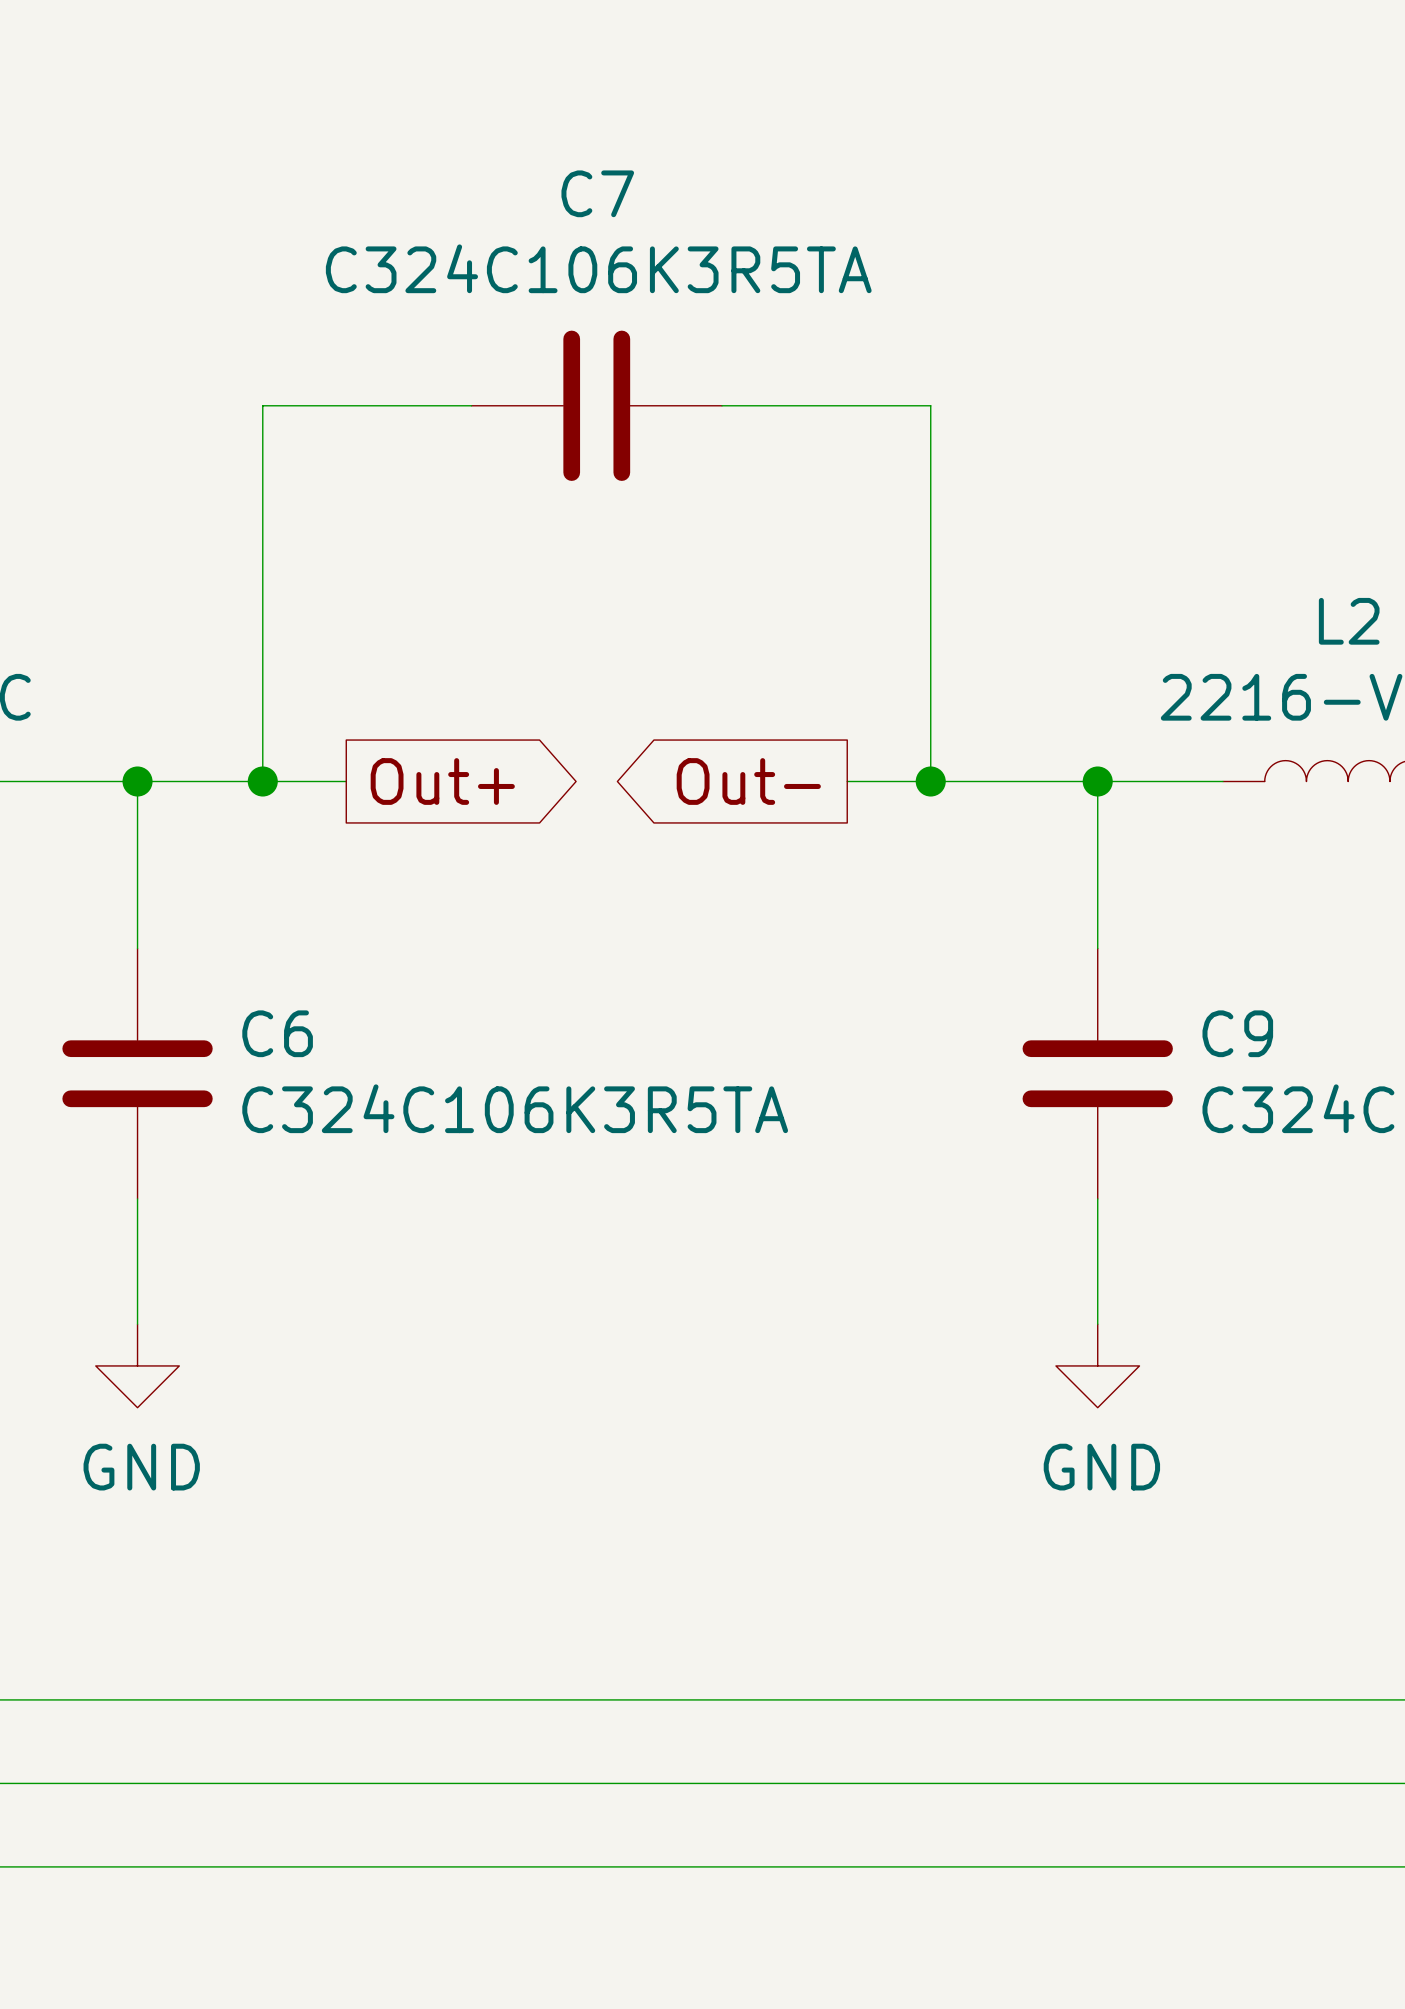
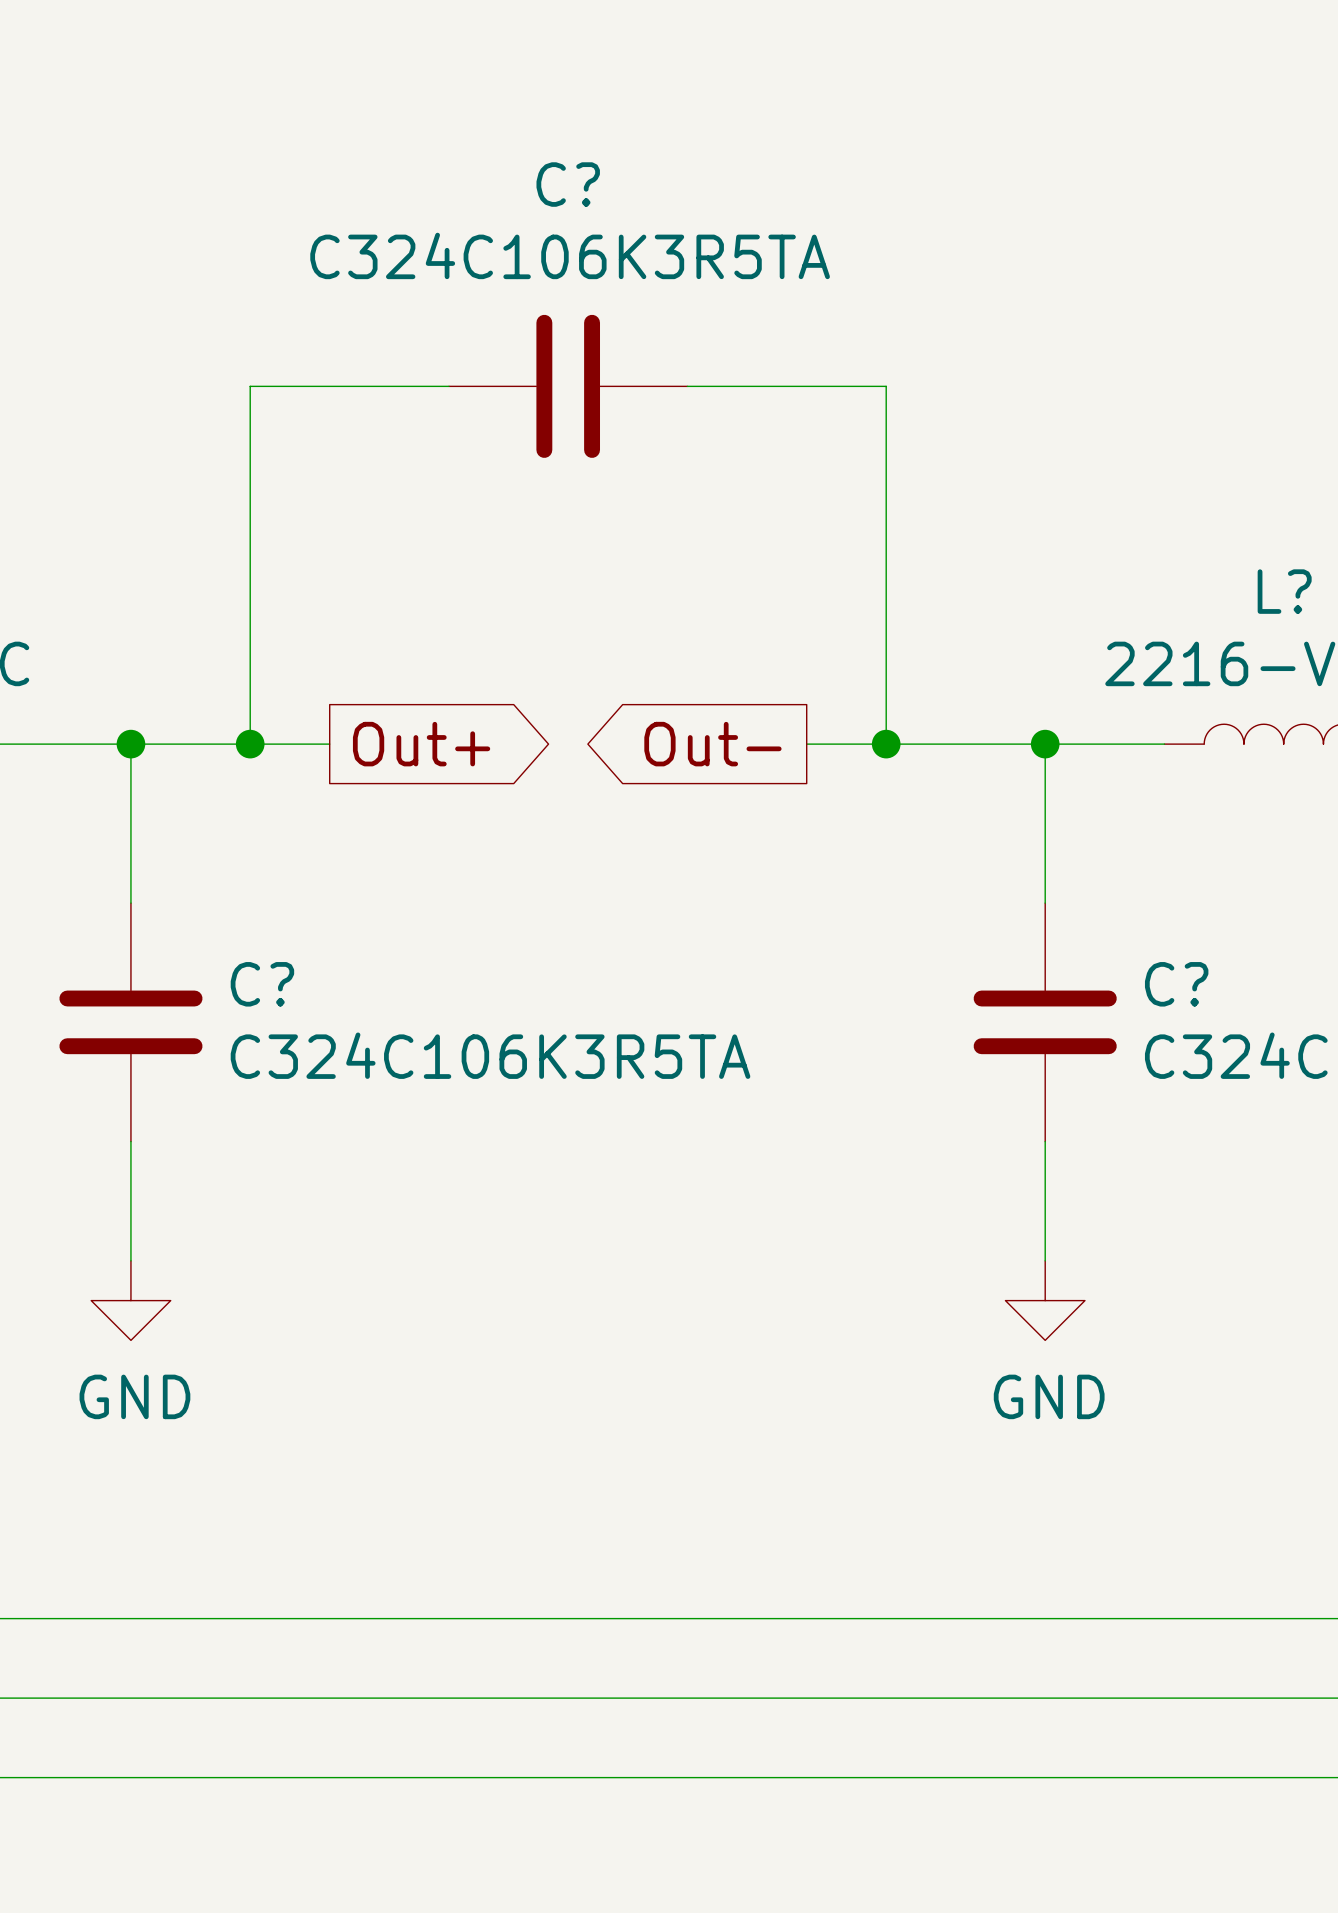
C7 name: C7 (597, 193) -> C? (568, 184)
L2 name: L2 (1349, 621) -> L? (1284, 591)
C6 name: C6 (277, 1033) -> C? (262, 984)
C9 name: C9 (1237, 1033) -> C? (1176, 984)

